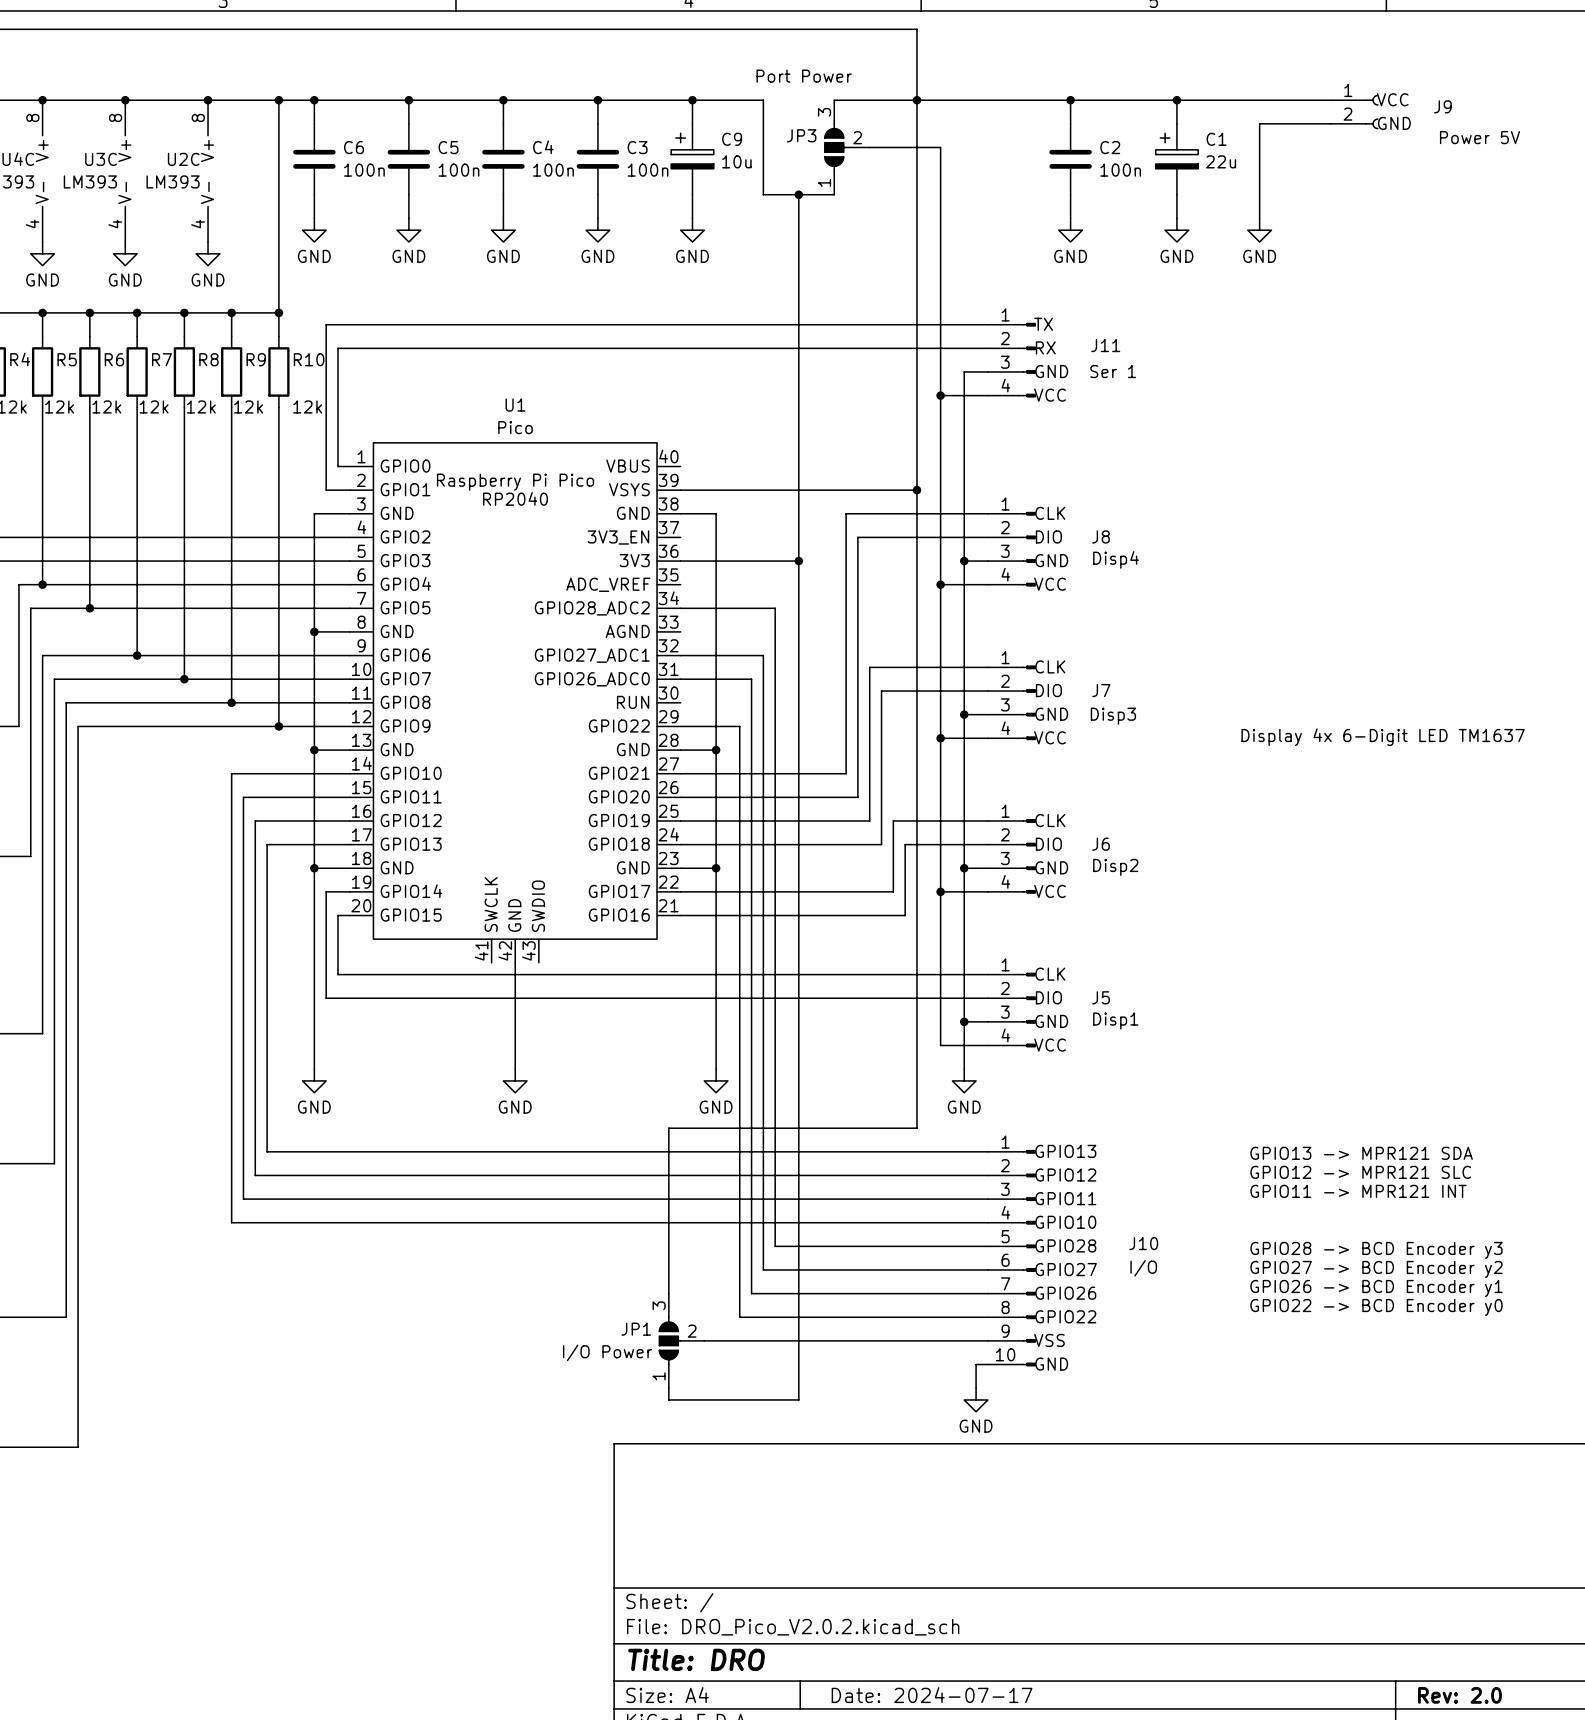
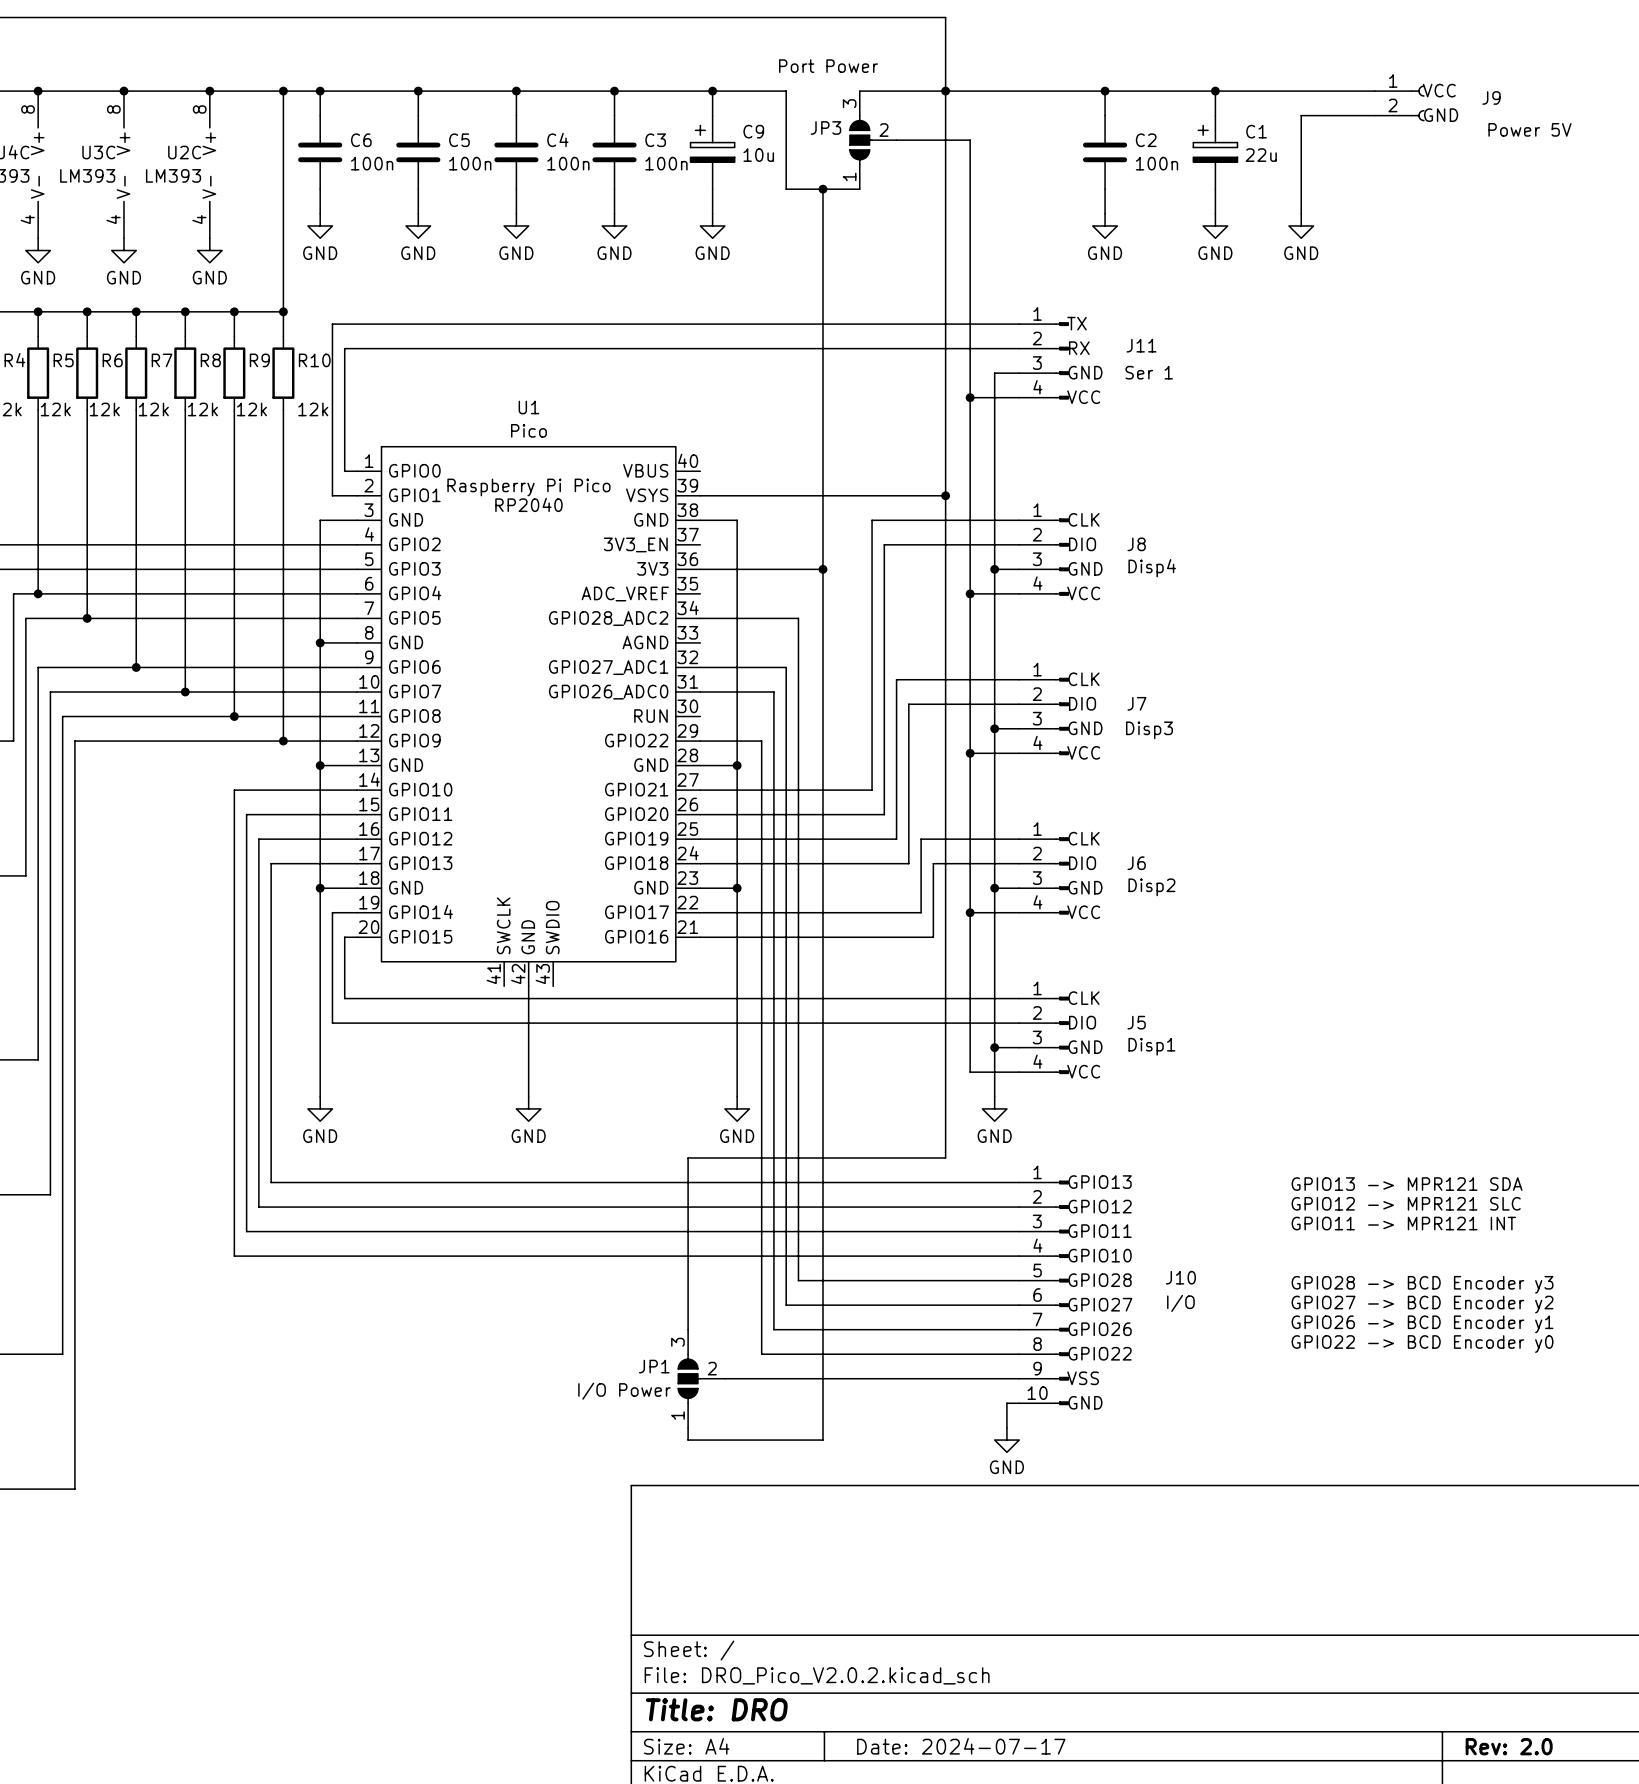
text: Display 4x 6-Digit LED TM1637 (1383, 737) -> none

